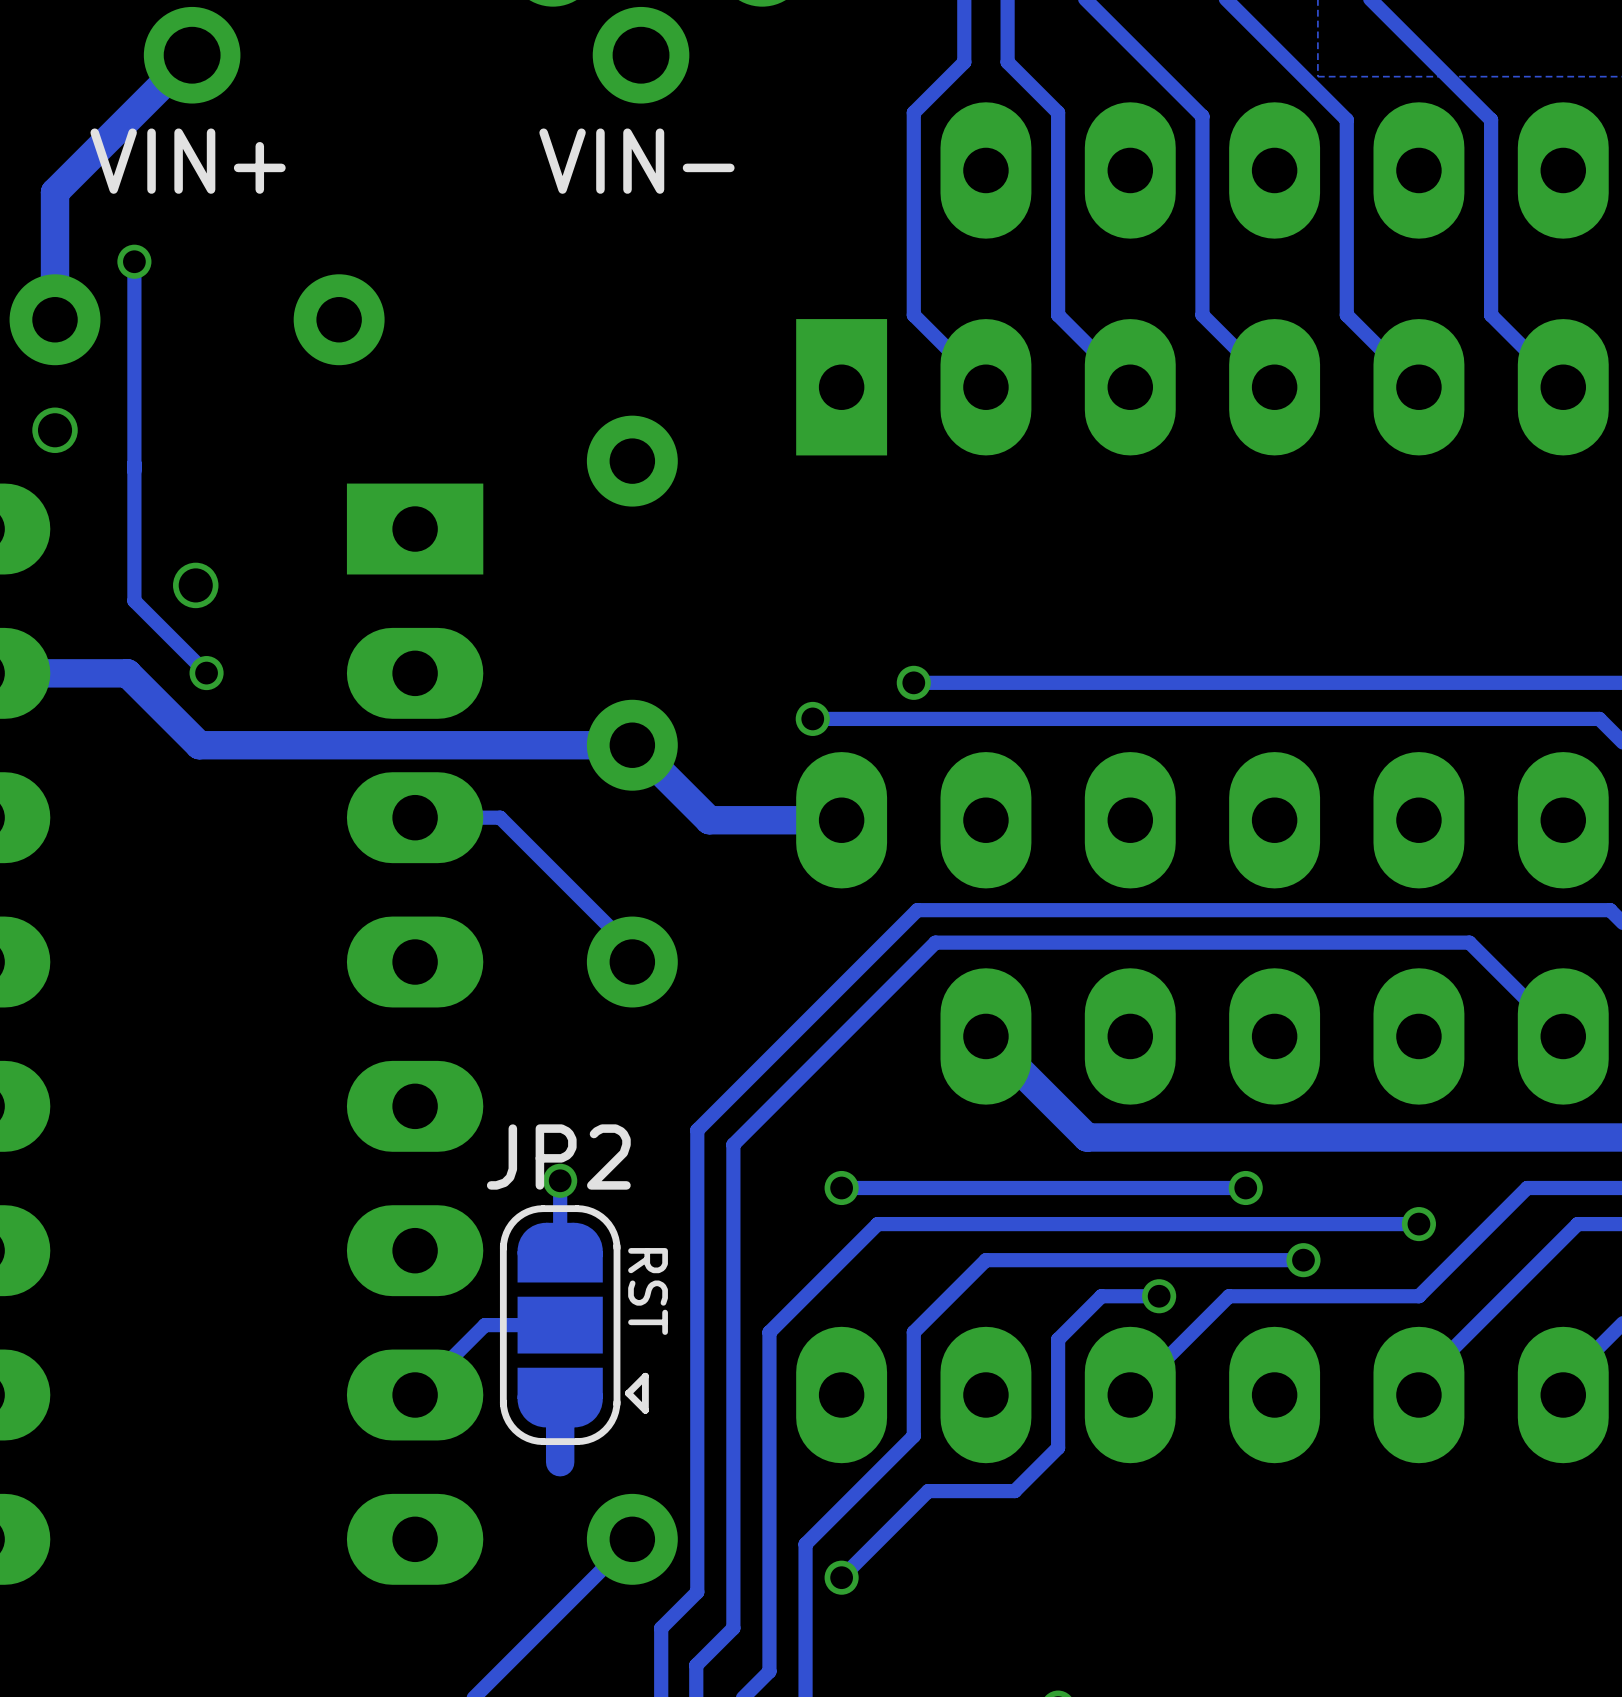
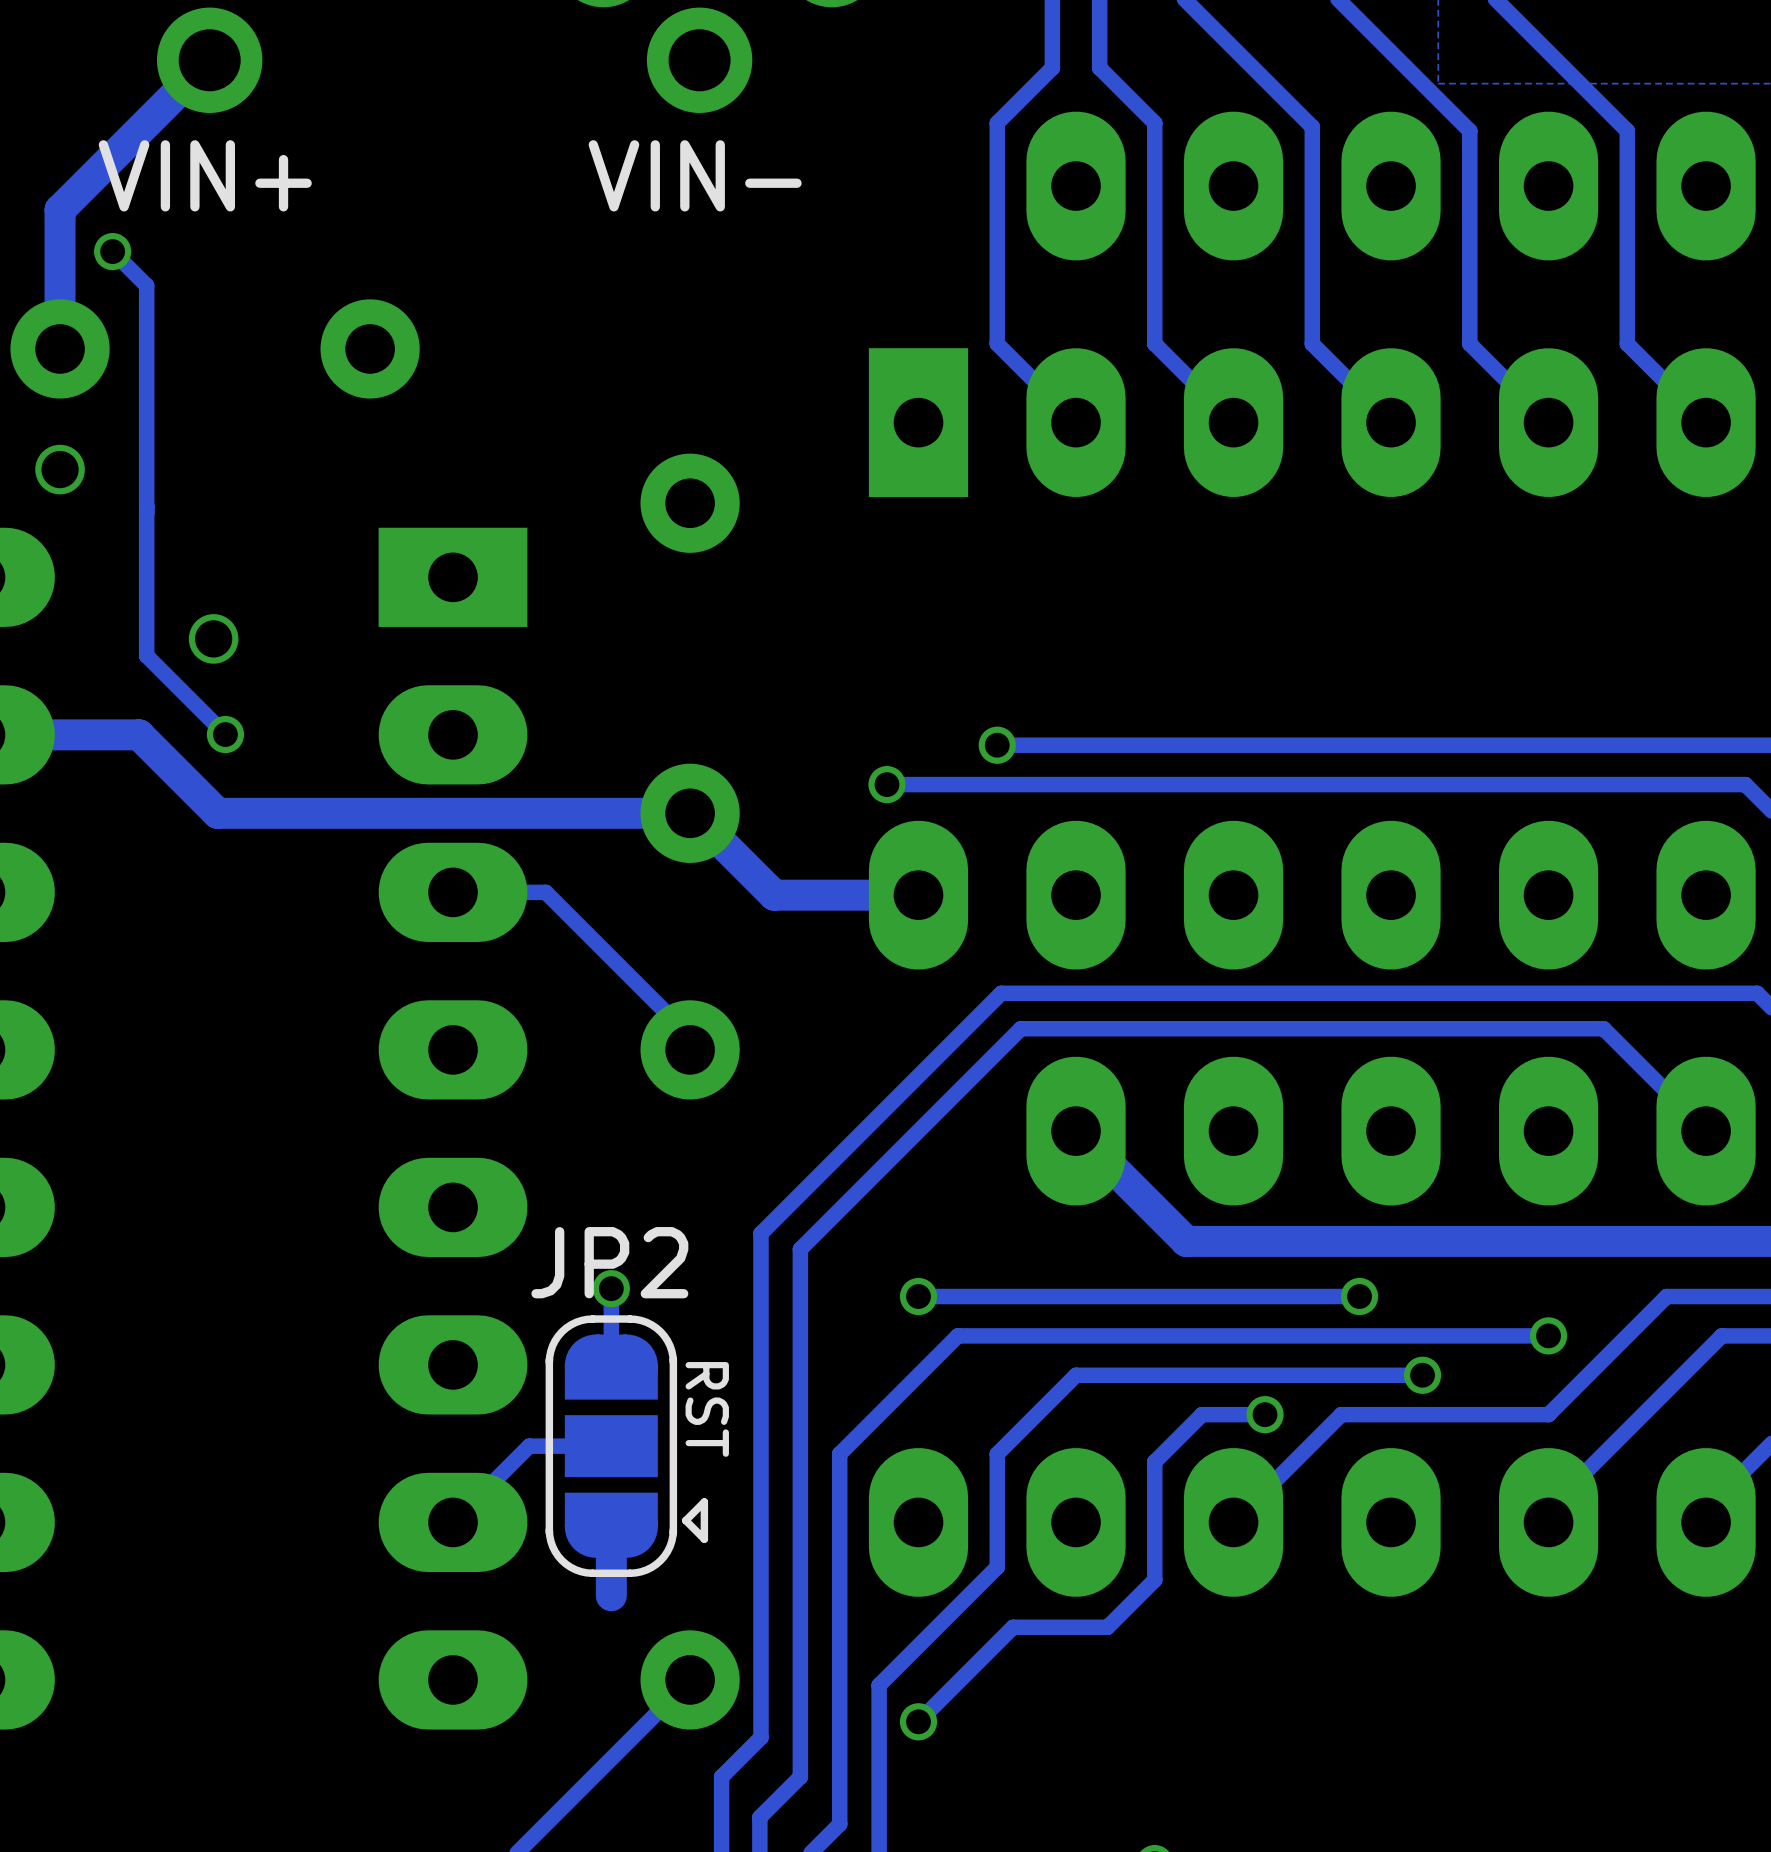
track: none -> (112, 251) (146, 285)
via position: (134, 261) -> (112, 251)

